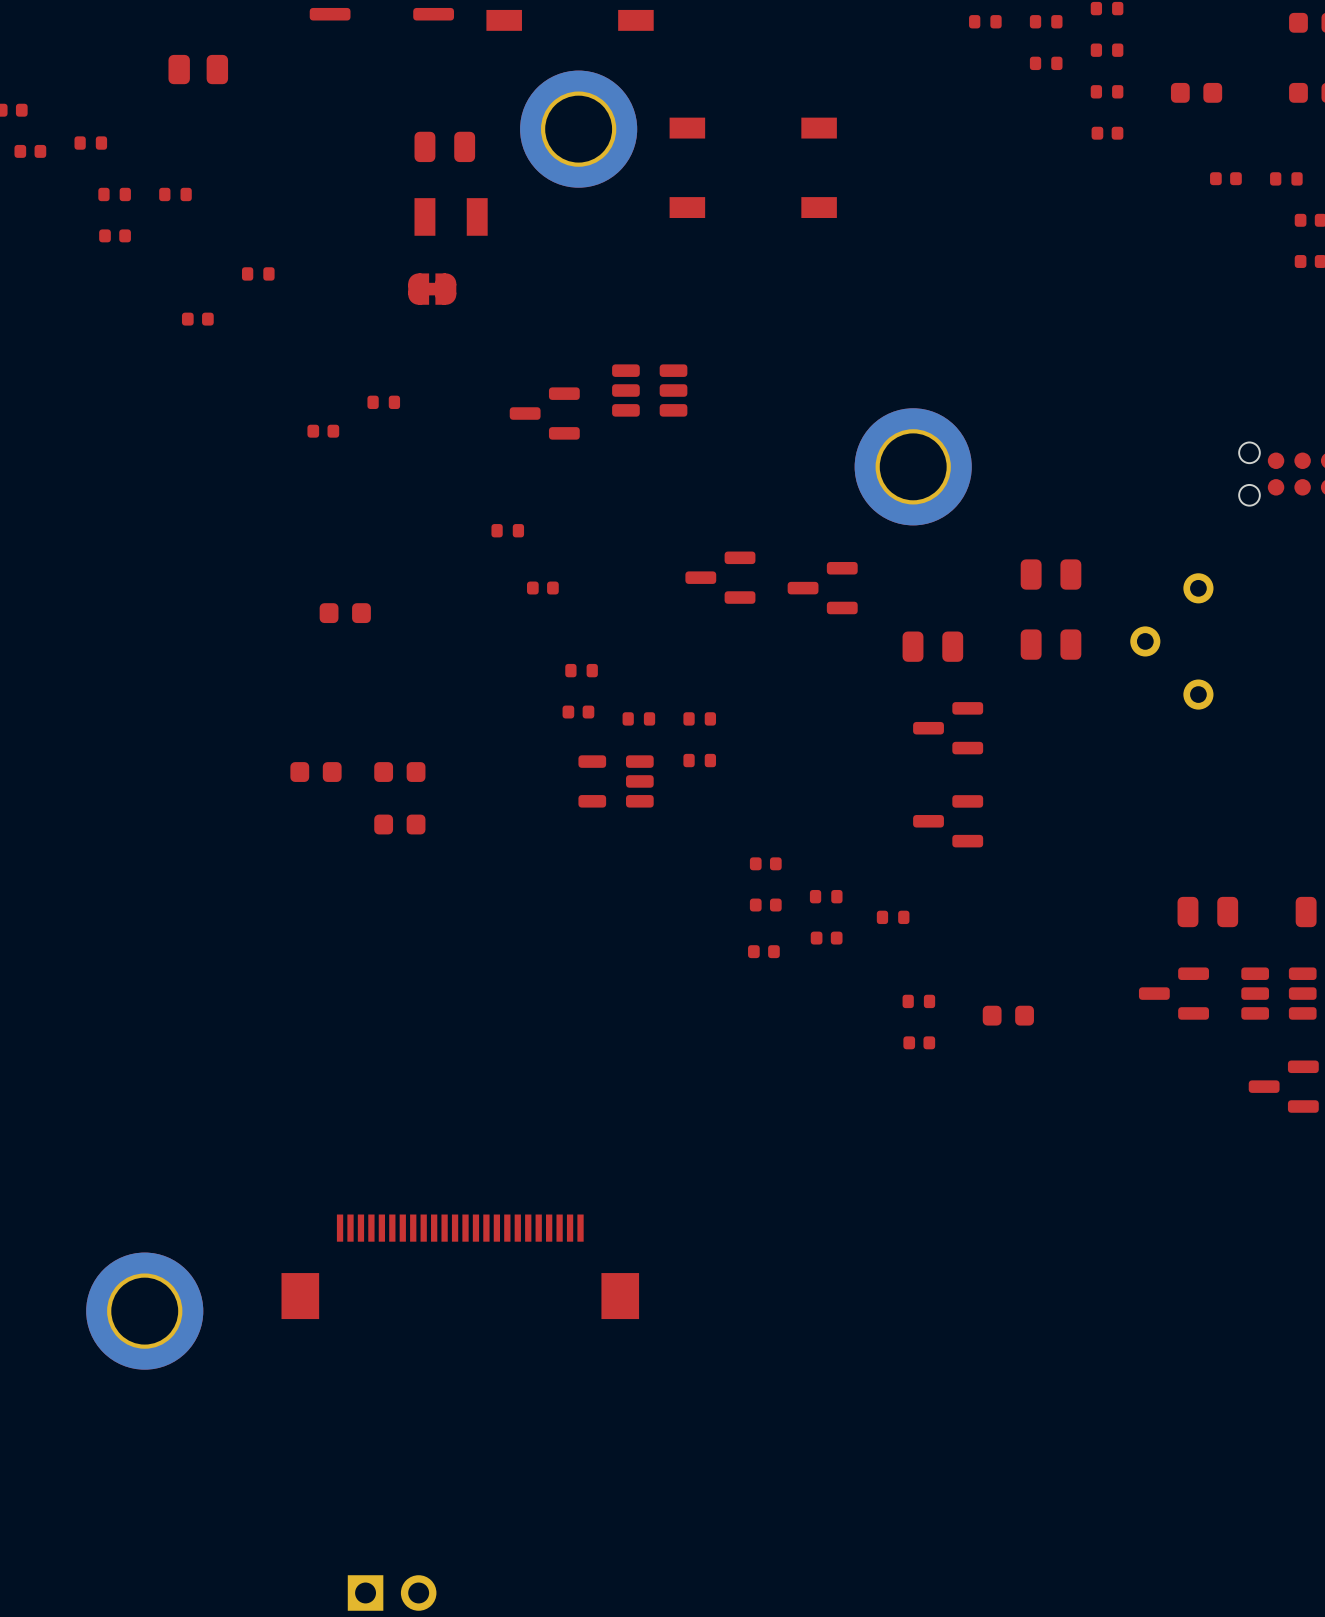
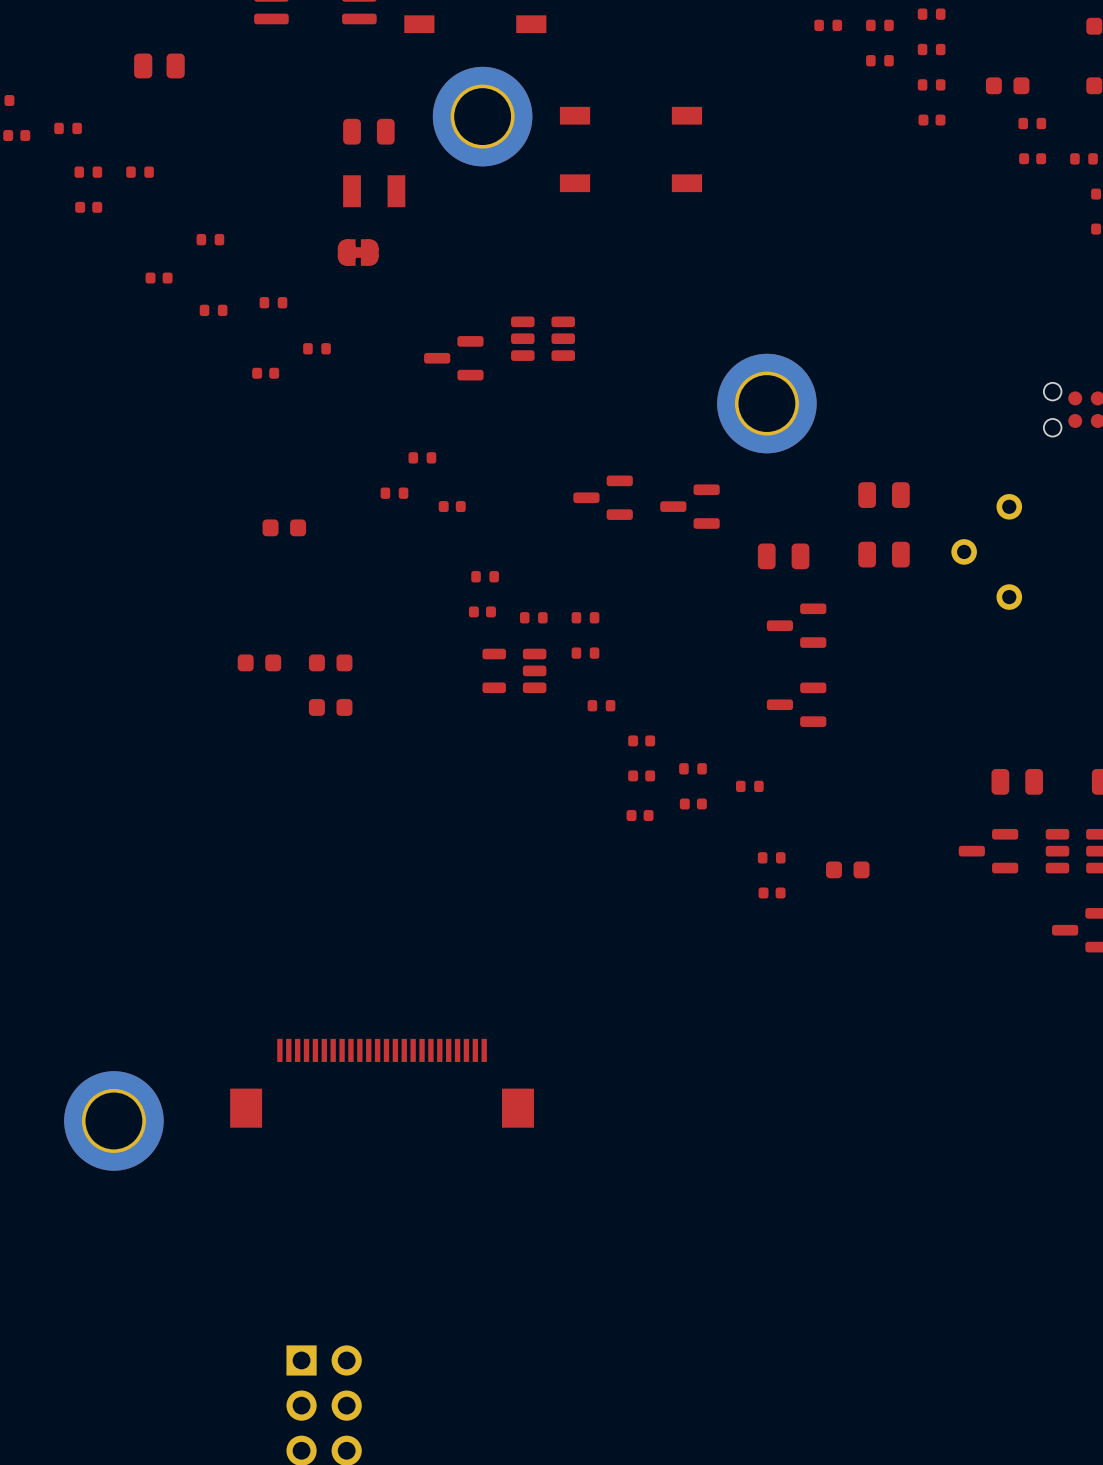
part: none -> (1032, 123)
part: none -> (273, 302)
part: none -> (213, 310)
part: none -> (394, 493)
part: none -> (601, 705)

